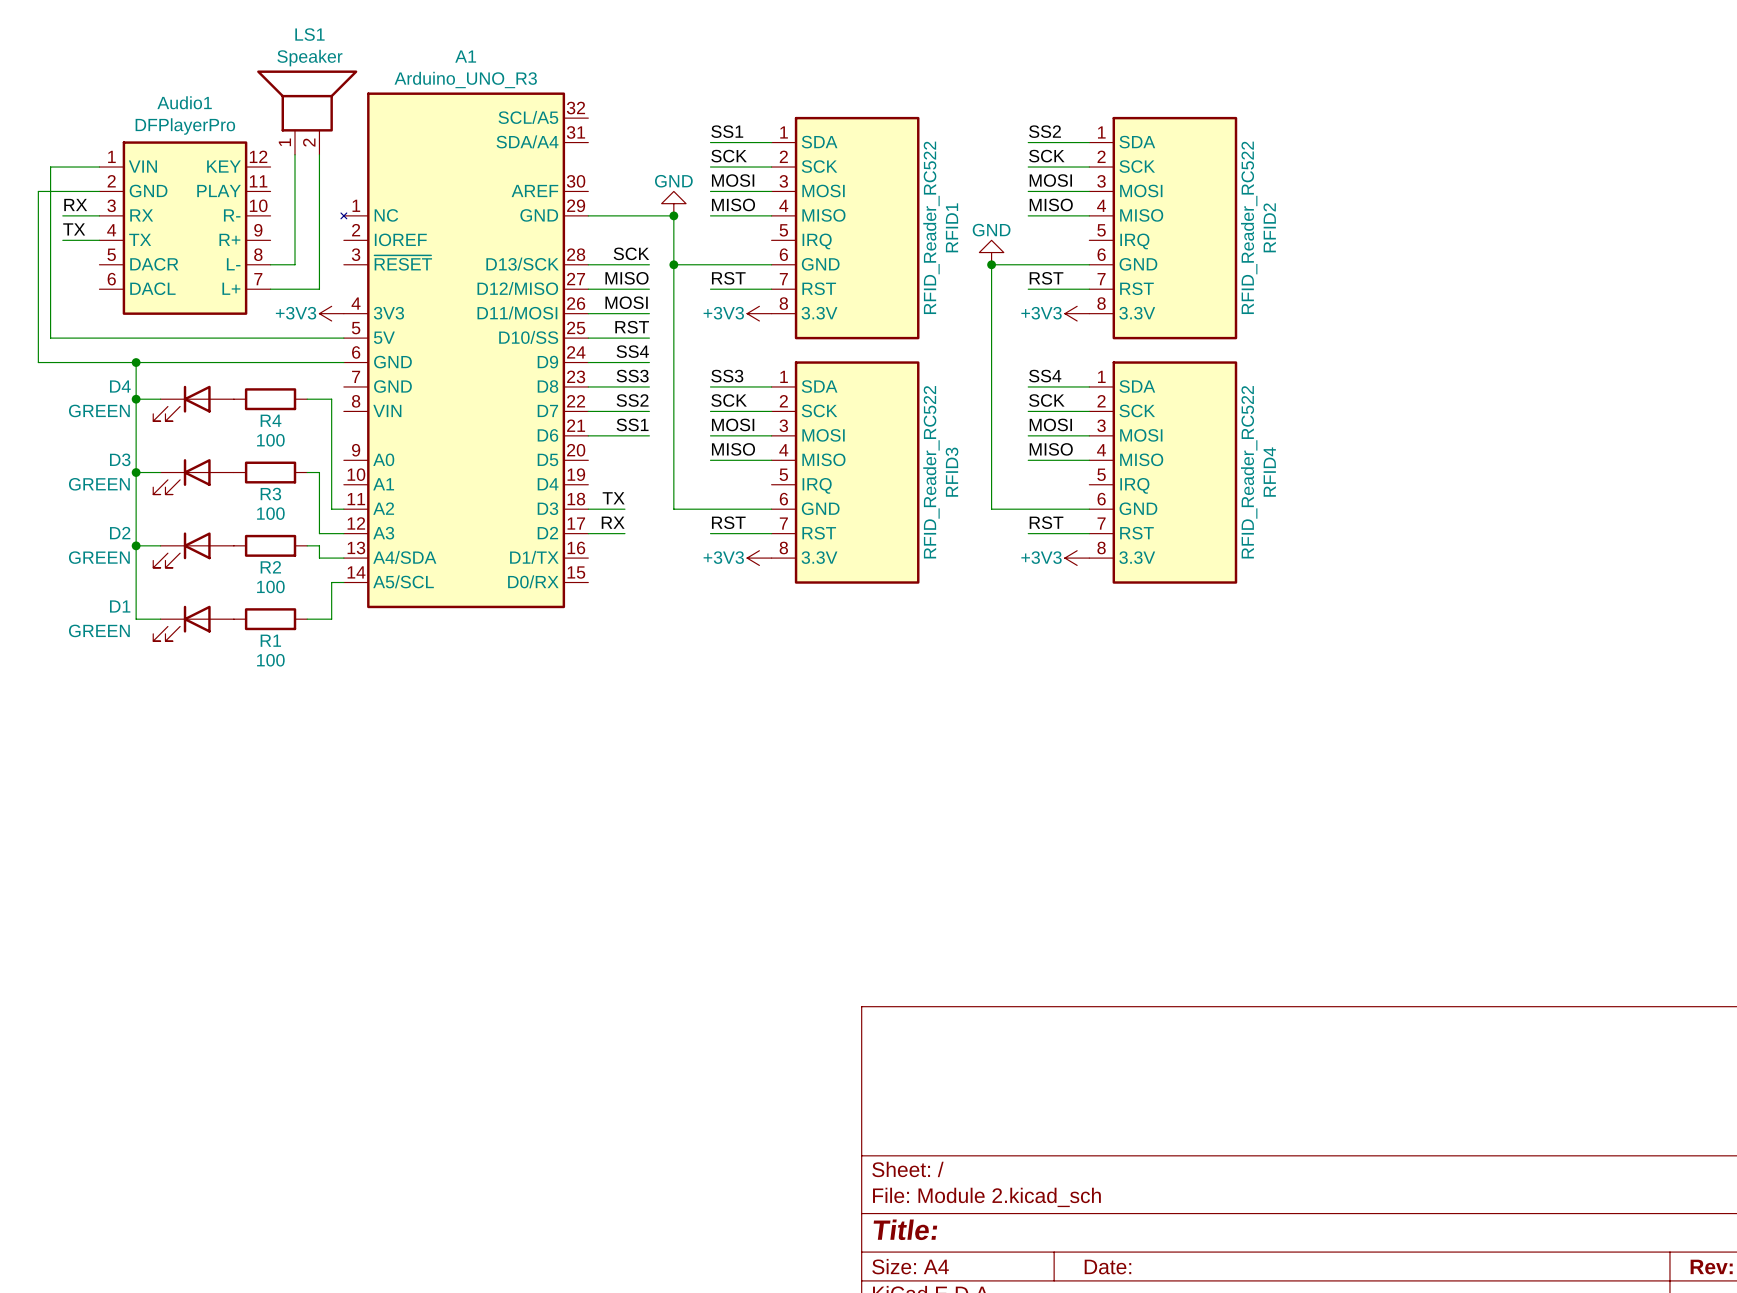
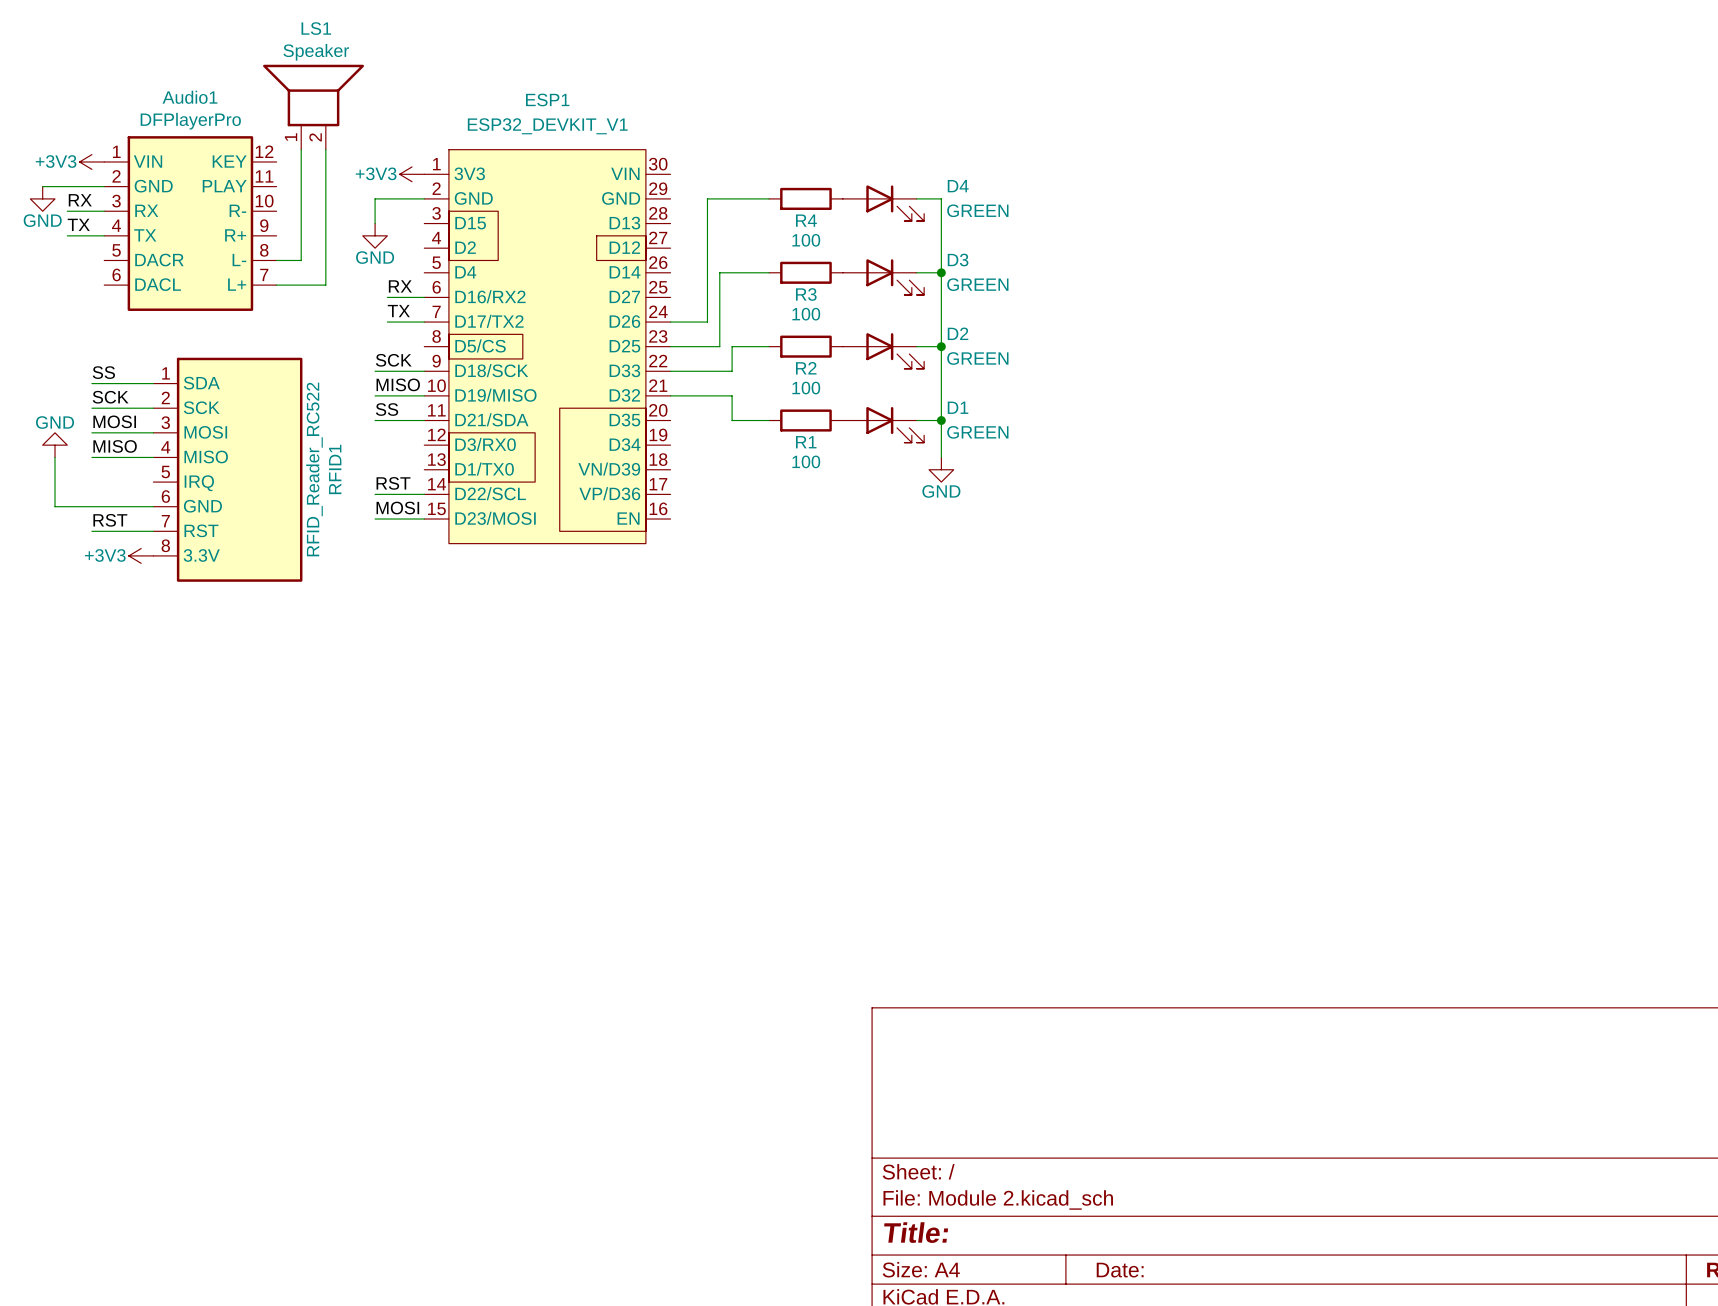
label: SS1 (727, 131) -> none
label: SS2 (1044, 131) -> none
wire: (710, 142) (771, 142) -> none
wire: (1028, 142) (1089, 142) -> none
label: SCK (729, 156) -> none
label: SCK (1046, 156) -> none
power symbol: none -> +3V3 (91, 161)
wire: (99, 167) (50, 167) (50, 338) (343, 338) -> none
wire: (710, 167) (771, 167) -> none
wire: (1028, 167) (1089, 167) -> none
power symbol: none -> +3V3 (412, 174)
label: MOSI (733, 180) -> none
label: MOSI (1050, 180) -> none
wire: (38, 191) (38, 362) (343, 362) -> none
wire: (710, 191) (771, 191) -> none
wire: (1028, 191) (1089, 191) -> none
power symbol: none -> GND (42, 198)
power symbol: GND (673, 203) -> none
wire: none -> (769, 198) (707, 198) (707, 322) (670, 322)
wire: none -> (916, 198) (941, 198) (941, 457)
label: MISO (733, 204) -> none
label: MISO (1051, 204) -> none
wire: (588, 215) (673, 215) (673, 509) (771, 509) -> none
junction: (673, 215) -> none
wire: (710, 215) (771, 215) -> none
wire: (1028, 215) (1089, 215) -> none
RFID1 position: (845, 228) -> (227, 469)
RFID2: RFID_Reader_RC522 (1163, 228) -> none
power symbol: none -> GND (375, 235)
power symbol: GND (991, 252) -> none
label: SCK (631, 253) -> none
wire: (673, 264) (771, 264) -> none
junction: (673, 264) -> none
junction: (991, 264) -> none
wire: (1089, 264) (991, 264) (991, 509) (1089, 509) -> none
wire: none -> (769, 272) (719, 272) (719, 346) (670, 346)
junction: none -> (941, 272)
label: MISO (627, 278) -> none
label: RST (728, 278) -> none
label: RST (1046, 278) -> none
wire: (710, 289) (771, 289) -> none
wire: (1028, 289) (1089, 289) -> none
label: none -> RX (400, 286)
label: MOSI (626, 302) -> none
power symbol: +3V3 (331, 313) -> none
power symbol: +3V3 (759, 313) -> none
power symbol: +3V3 (1077, 313) -> none
label: none -> TX (398, 311)
label: RST (632, 327) -> none
A1: Arduino_UNO_R3 (464, 350) -> none
ESP1: none -> ESP32_DEVKIT_V1 (547, 346)
wire: none -> (769, 346) (732, 346) (732, 371) (670, 371)
wire: none -> (916, 346) (941, 346)
junction: none -> (941, 346)
label: SS4 (632, 351) -> none
wire: (136, 362) (136, 619) (160, 619) -> none
junction: (136, 362) -> none
label: none -> SCK (393, 360)
label: none -> SS (103, 372)
label: SS3 (632, 376) -> none
label: SS3 (727, 376) -> none
label: SS4 (1045, 376) -> none
wire: none -> (91, 383) (153, 383)
wire: (710, 386) (771, 386) -> none
wire: (1028, 386) (1089, 386) -> none
label: none -> MISO (398, 384)
wire: (136, 399) (160, 399) -> none
junction: (136, 399) -> none
R4 position: (270, 399) -> (805, 198)
wire: (307, 399) (331, 399) (331, 509) (343, 509) -> none
wire: none -> (670, 395) (732, 395) (732, 420) (769, 420)
label: none -> SCK (110, 397)
label: SS2 (632, 400) -> none
label: SCK (729, 400) -> none
label: SCK (1046, 400) -> none
D4 flip: as is (181, 403) -> left-right (895, 203)
D4 position: (193, 403) -> (883, 203)
wire: none -> (91, 408) (153, 408)
wire: (710, 411) (771, 411) -> none
wire: (1028, 411) (1089, 411) -> none
label: none -> SS (387, 409)
junction: none -> (941, 420)
label: none -> MOSI (114, 421)
label: SS1 (632, 424) -> none
label: MOSI (733, 424) -> none
label: MOSI (1050, 424) -> none
wire: none -> (91, 432) (153, 432)
wire: (710, 435) (771, 435) -> none
wire: (1028, 435) (1089, 435) -> none
power symbol: none -> GND (55, 445)
label: none -> MISO (115, 446)
label: MISO (733, 449) -> none
label: MISO (1051, 449) -> none
wire: none -> (55, 457) (55, 506) (153, 506)
wire: none -> (91, 457) (153, 457)
wire: (710, 460) (771, 460) -> none
wire: (1028, 460) (1089, 460) -> none
wire: (136, 472) (160, 472) -> none
junction: (136, 472) -> none
R3 position: (270, 472) -> (805, 272)
wire: (307, 472) (319, 472) (319, 533) (343, 533) -> none
RFID3: RFID_Reader_RC522 (845, 472) -> none
power symbol: none -> GND (941, 469)
RFID4: RFID_Reader_RC522 (1163, 472) -> none
D3 flip: as is (181, 476) -> left-right (895, 277)
D3 position: (193, 476) -> (883, 277)
label: none -> RST (393, 483)
label: TX (613, 498) -> none
label: none -> MOSI (397, 508)
label: none -> RST (110, 520)
label: RX (613, 522) -> none
label: RST (728, 522) -> none
label: RST (1046, 522) -> none
wire: none -> (91, 531) (153, 531)
wire: (710, 533) (771, 533) -> none
wire: (1028, 533) (1089, 533) -> none
wire: (136, 545) (160, 545) -> none
junction: (136, 545) -> none
R2 position: (270, 545) -> (805, 346)
wire: (307, 545) (319, 545) (319, 558) (343, 558) -> none
D2 flip: as is (181, 550) -> left-right (895, 350)
D2 position: (193, 550) -> (883, 350)
power symbol: none -> +3V3 (141, 555)
power symbol: +3V3 (759, 558) -> none
power symbol: +3V3 (1077, 558) -> none
wire: (343, 582) (331, 582) (331, 619) (307, 619) -> none
R1 position: (270, 619) -> (805, 420)
D1 flip: as is (181, 623) -> left-right (895, 424)
D1 position: (193, 623) -> (883, 424)

